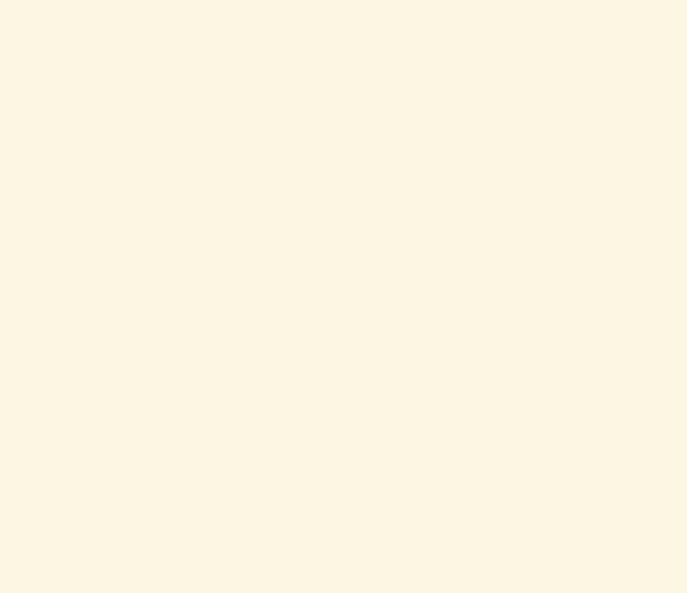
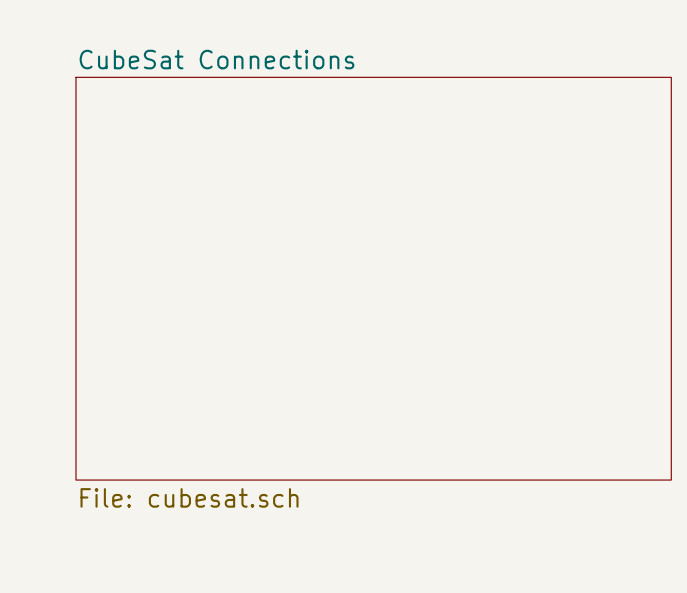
sheet CubeSat Connections: none -> File: cubesat.sch (373, 278)

